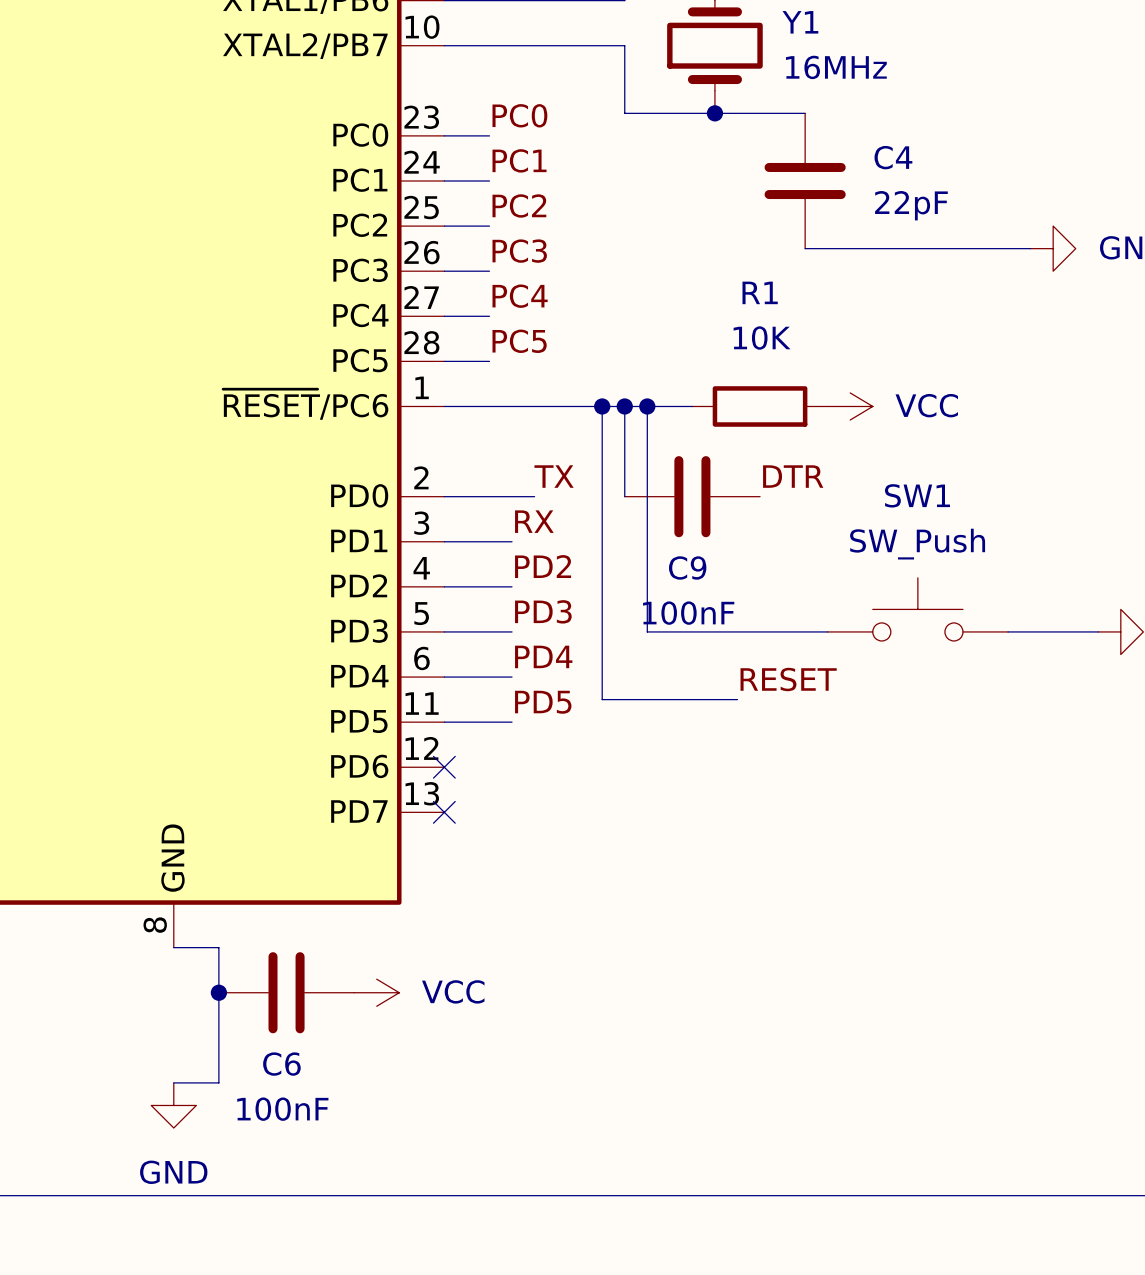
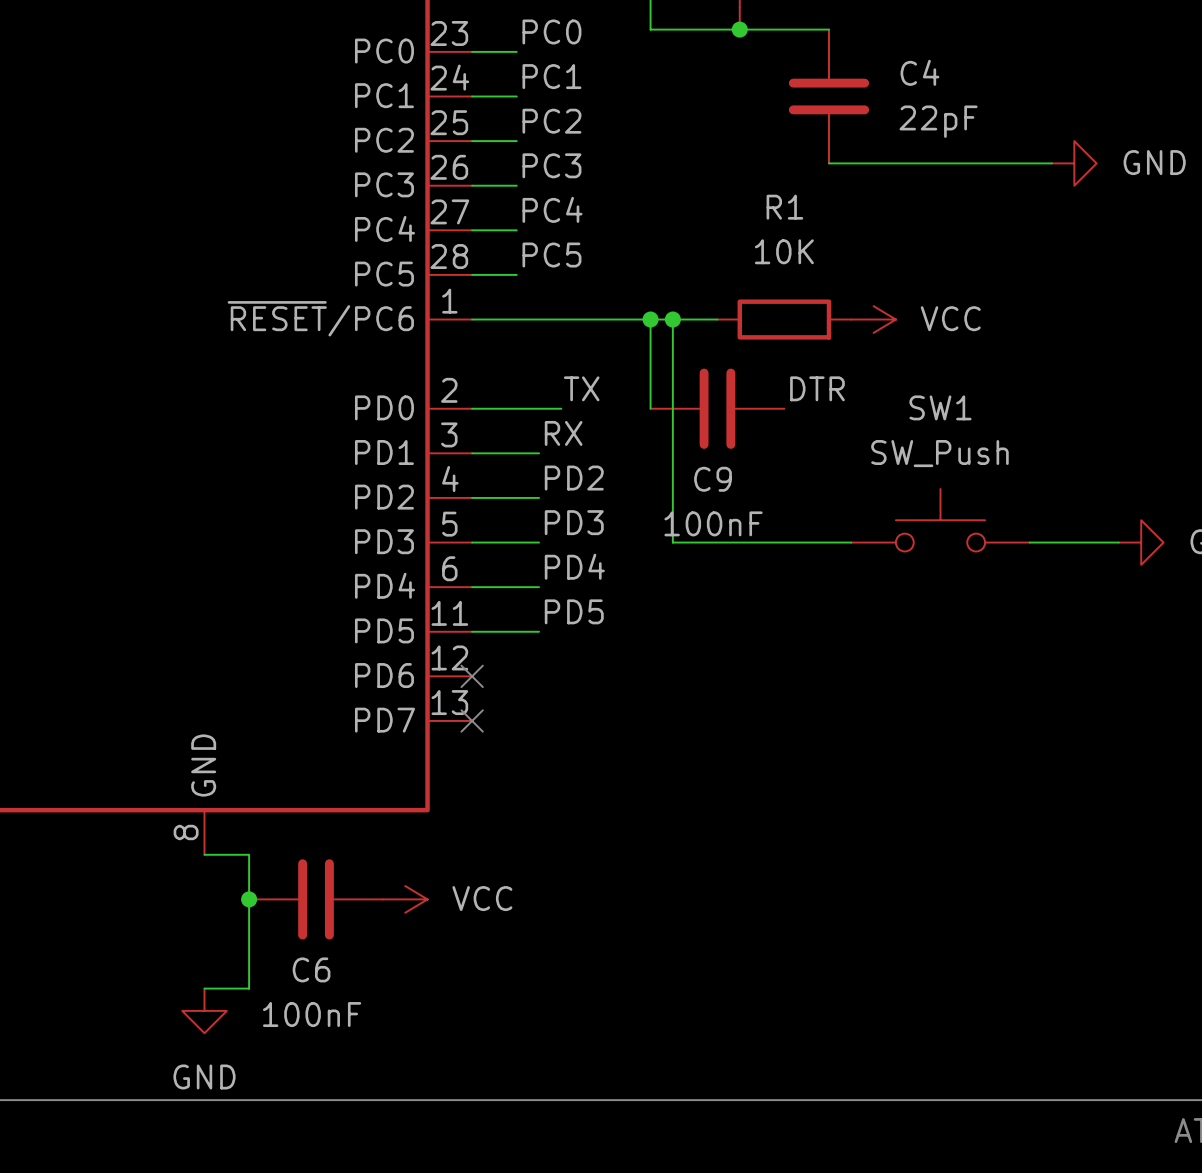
wire: (602, 406) (602, 699) (737, 699) -> none
junction: (602, 406) -> none
label: RESET (788, 679) -> none

